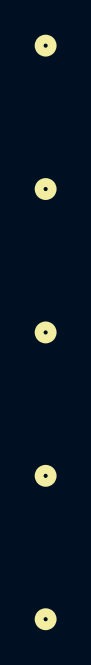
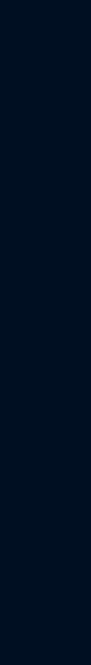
part: (45, 45) -> none
part: (45, 189) -> none
part: (45, 332) -> none
part: (45, 475) -> none
part: (45, 619) -> none

